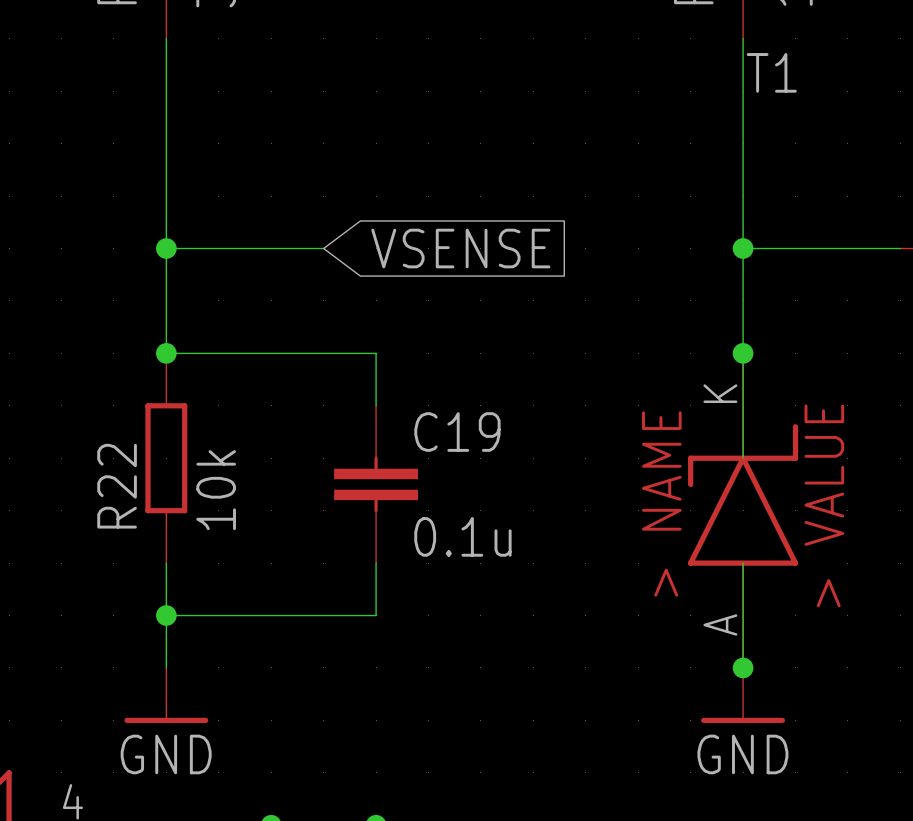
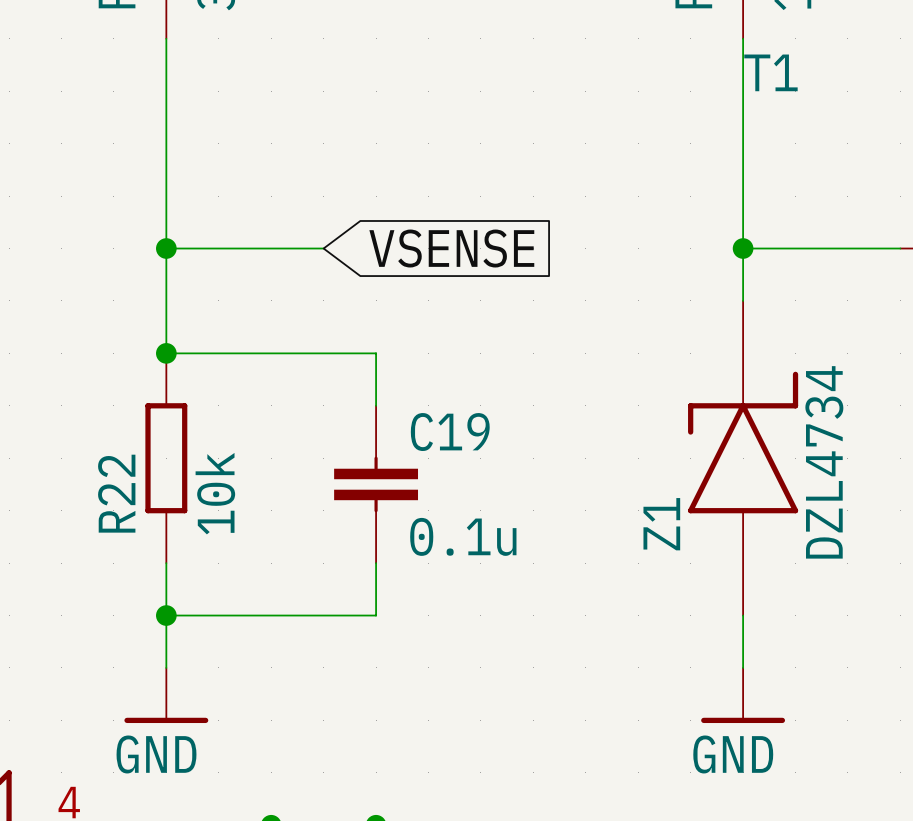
junction: (743, 353) -> none
Z1: none -> DZL4734 (743, 458)
part: (743, 510) -> none
junction: (743, 667) -> none

